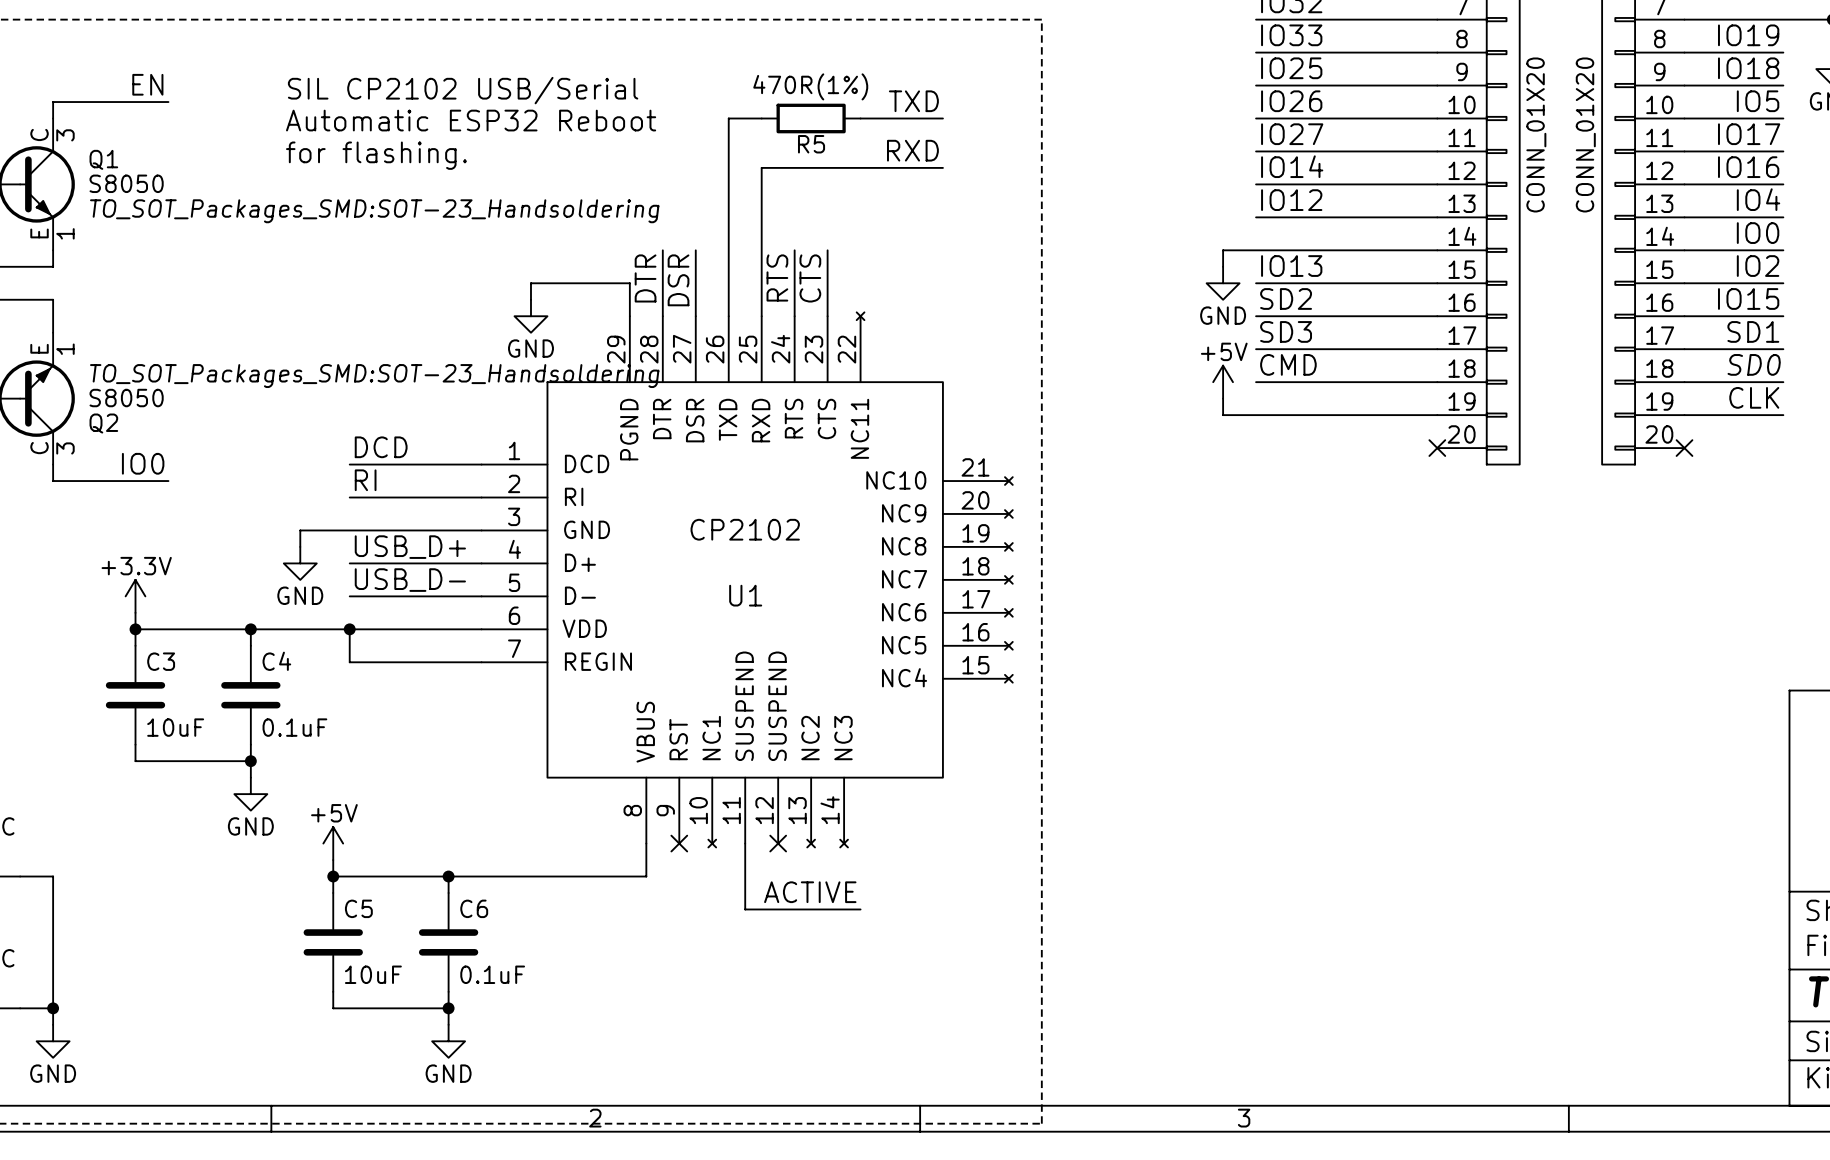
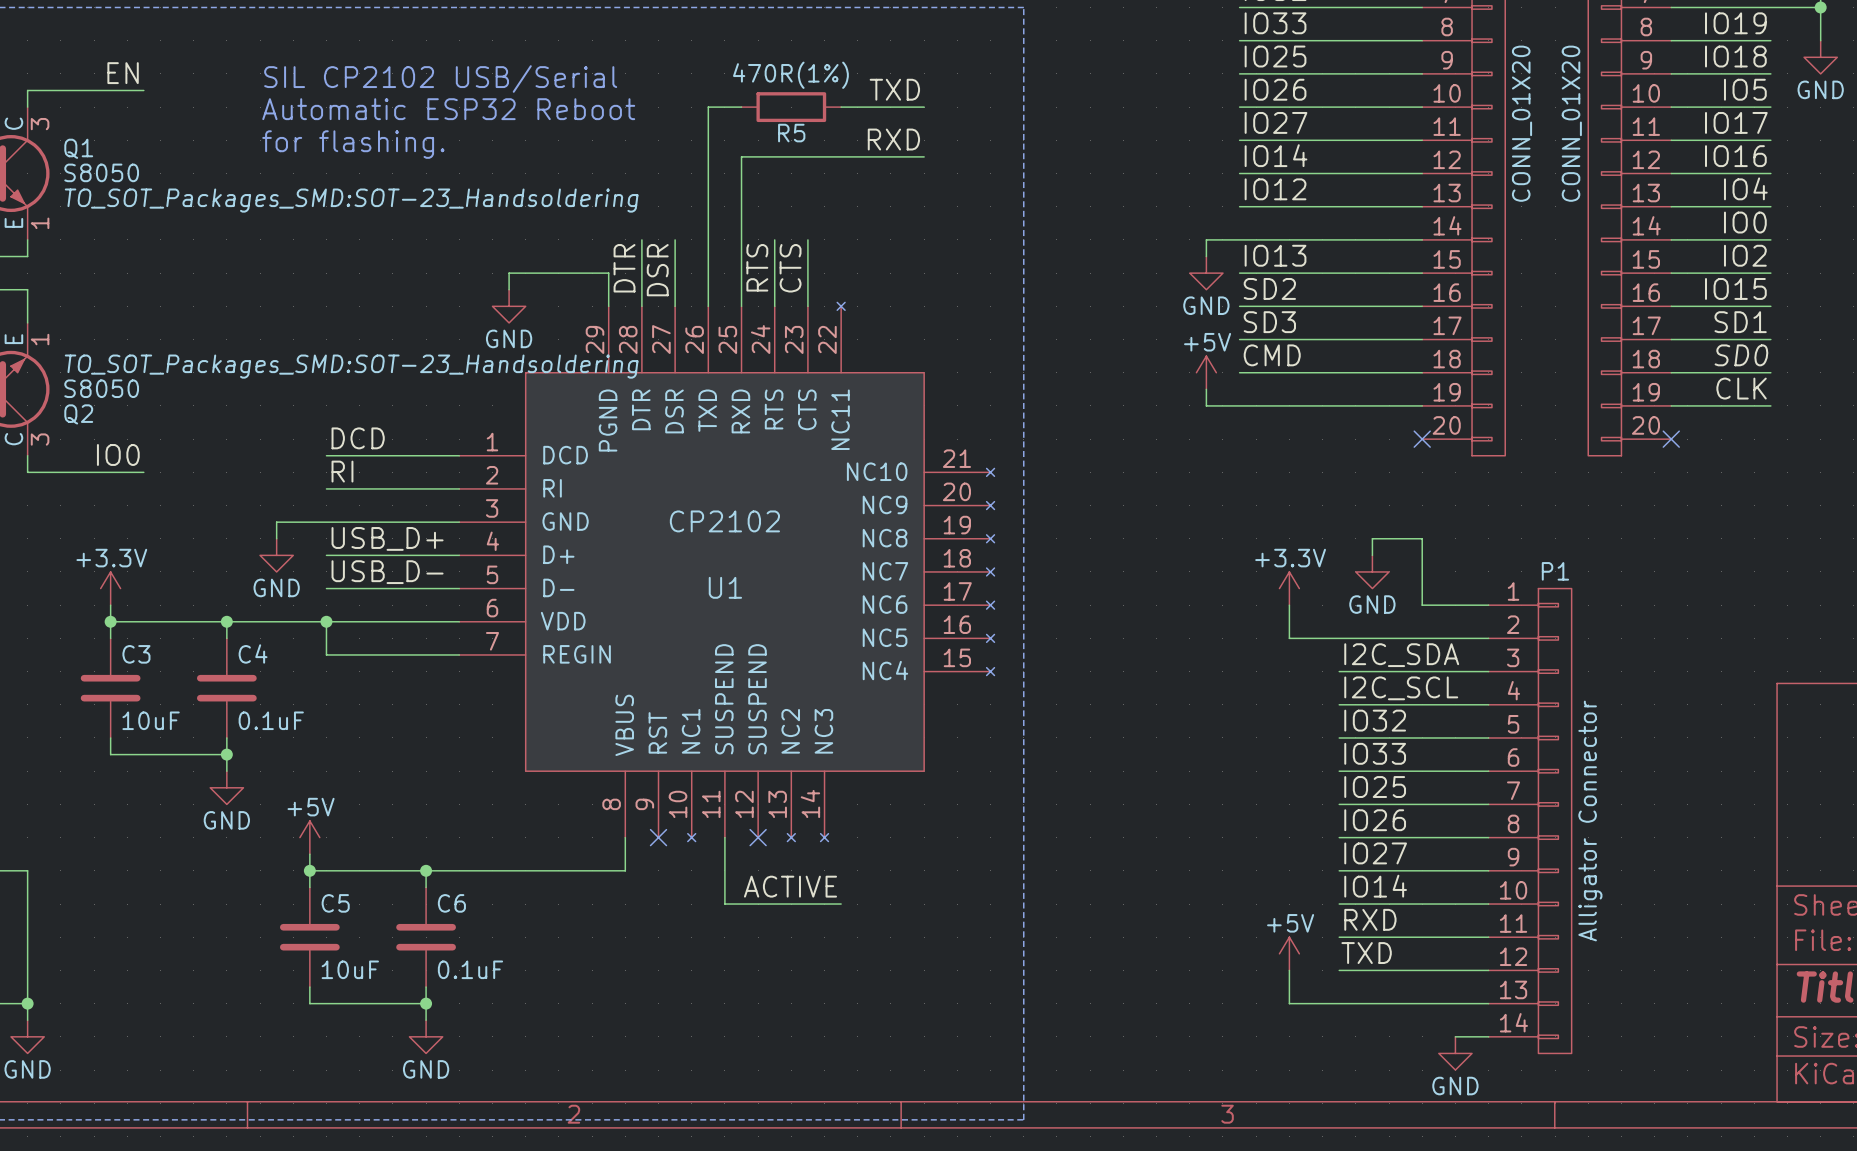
wire: none -> (1372, 555) (1372, 538) (1422, 538) (1422, 605) (1488, 605)
power symbol: none -> GND (1372, 571)
power symbol: none -> +3.3V (1289, 588)
wire: none -> (1289, 605) (1289, 638) (1488, 638)
label: none -> I2C_SDA (1401, 655)
wire: none -> (1339, 671) (1488, 671)
label: none -> I2C_SCL (1401, 688)
wire: none -> (1339, 704) (1488, 704)
label: none -> IO32 (1375, 720)
wire: none -> (1339, 737) (1488, 737)
label: none -> IO33 (1375, 753)
wire: none -> (1339, 771) (1488, 771)
label: none -> IO25 (1375, 787)
wire: none -> (1339, 804) (1488, 804)
label: none -> IO26 (1375, 820)
P1: none -> Alligator Connector (1530, 821)
wire: none -> (1339, 837) (1488, 837)
label: none -> IO27 (1375, 853)
wire: none -> (1339, 870) (1488, 870)
label: none -> IO14 (1375, 886)
wire: none -> (1339, 904) (1488, 904)
label: none -> RXD (1370, 919)
wire: none -> (1339, 937) (1488, 937)
power symbol: none -> +5V (1289, 953)
label: none -> TXD (1366, 953)
wire: none -> (1289, 970) (1289, 1003) (1488, 1003)
wire: none -> (1339, 970) (1488, 970)
wire: none -> (1455, 1036) (1488, 1036)
power symbol: none -> GND (1455, 1053)

